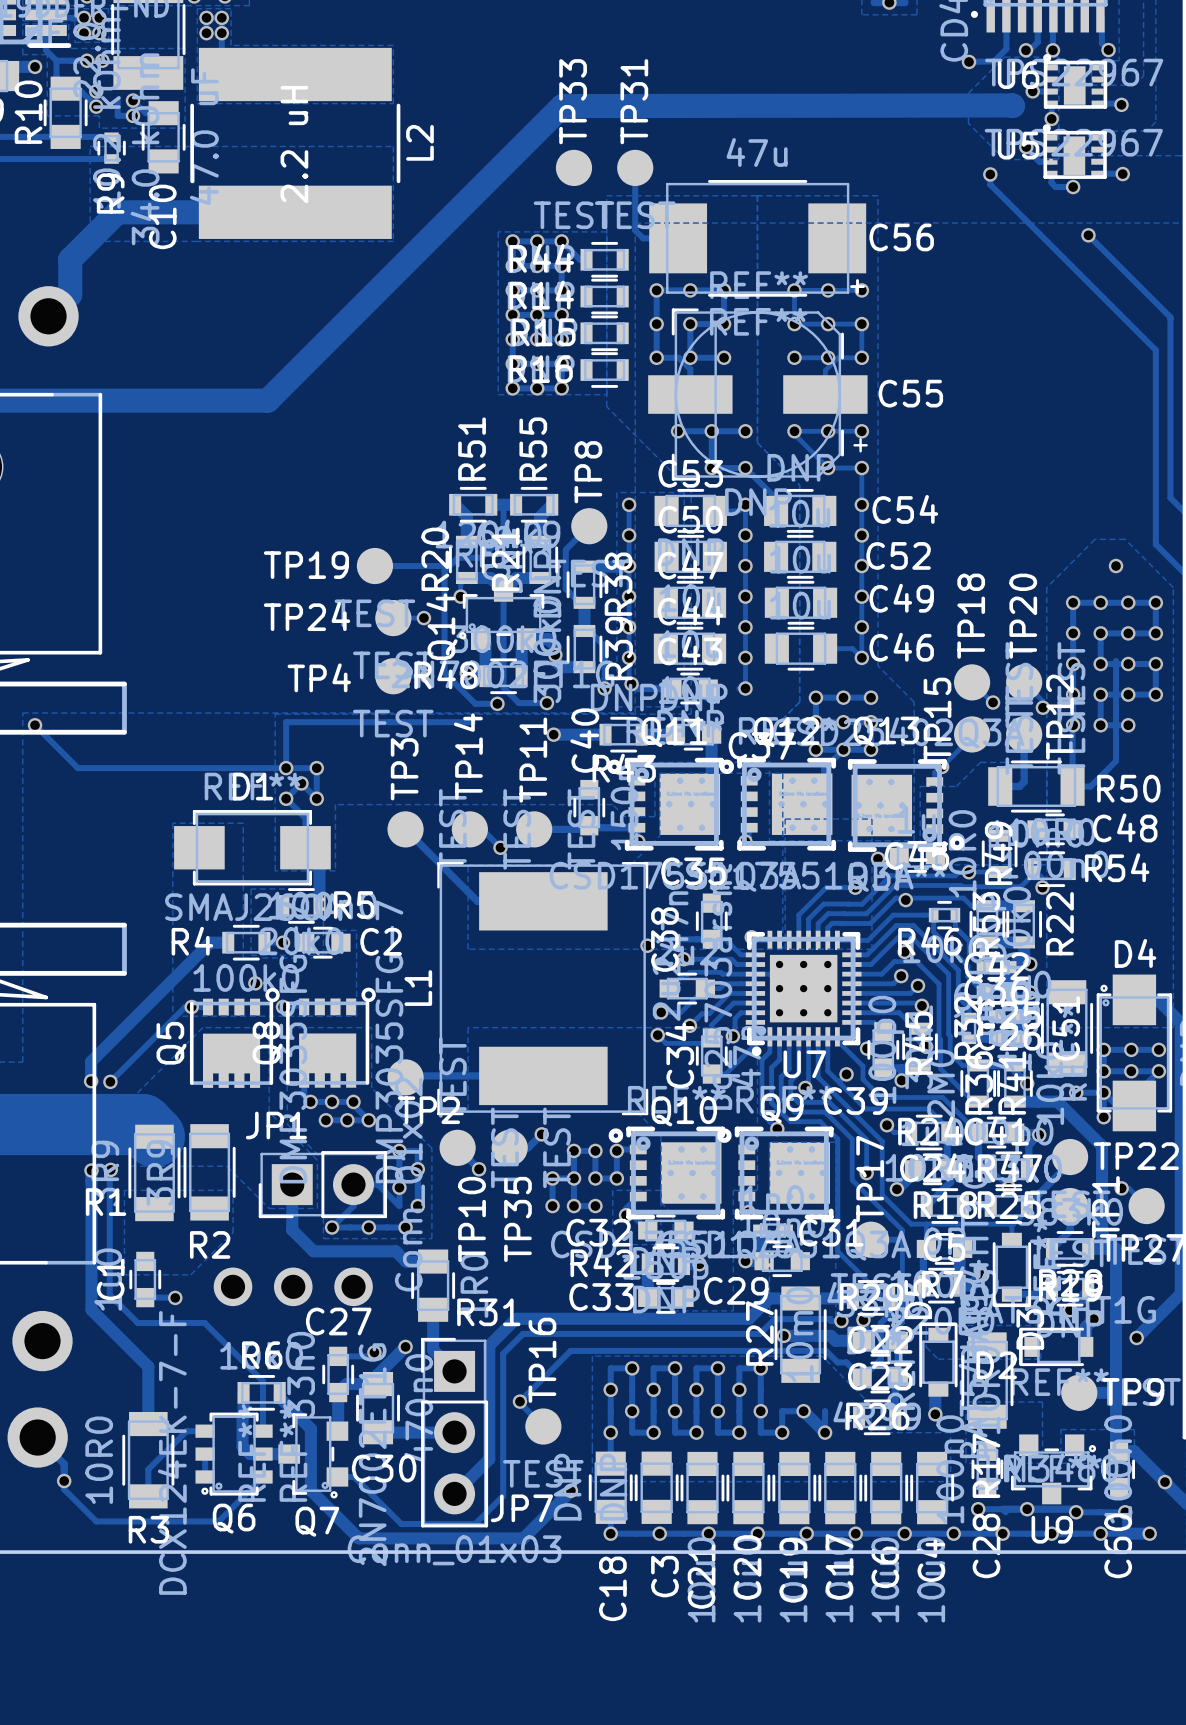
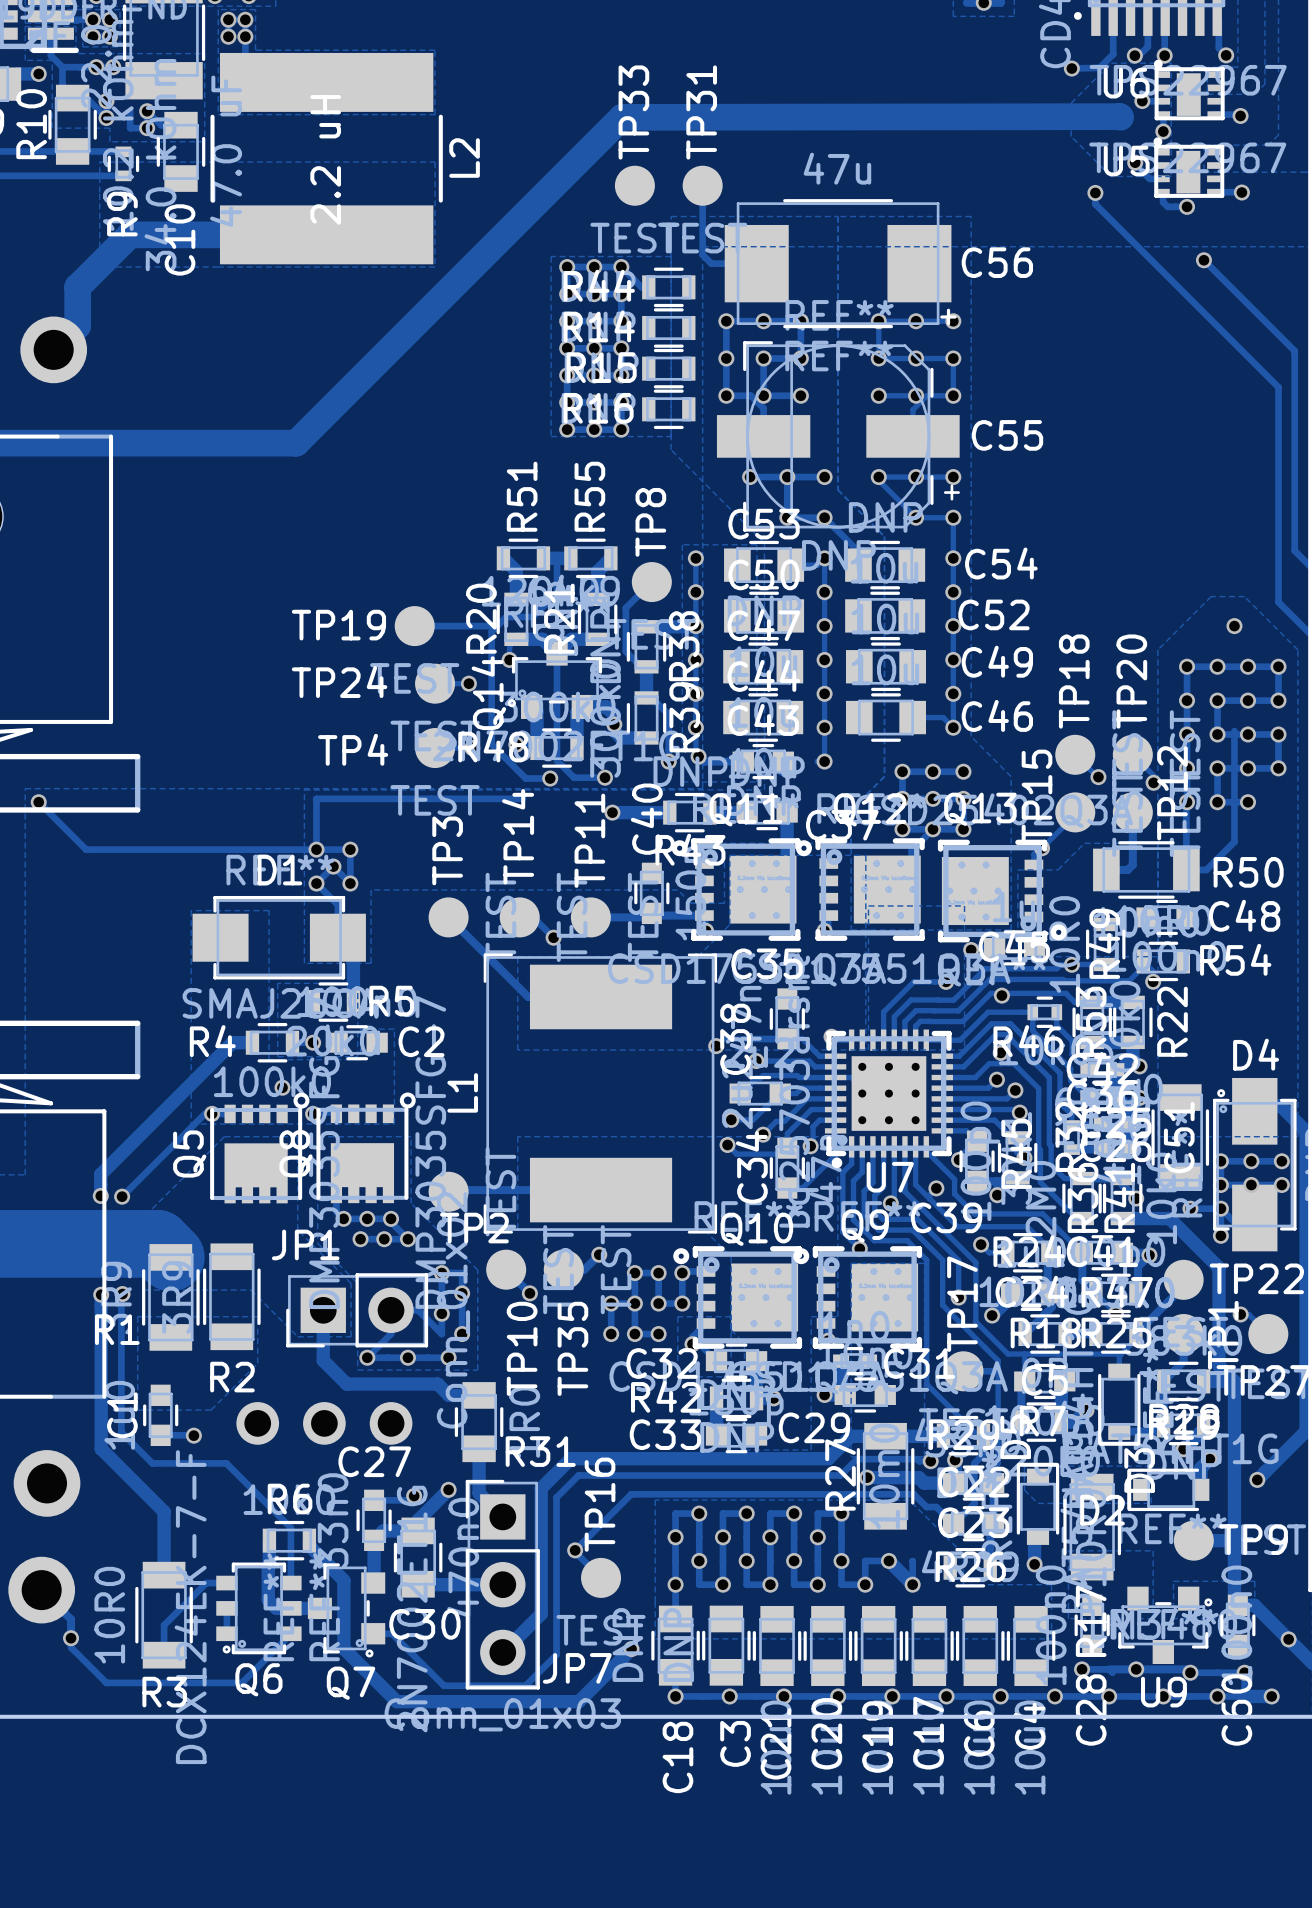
C56 footprint: [649, 180, 867, 297] -> [724, 199, 957, 329]
D4 footprint: [1096, 974, 1173, 1132] -> [1213, 1077, 1297, 1252]

